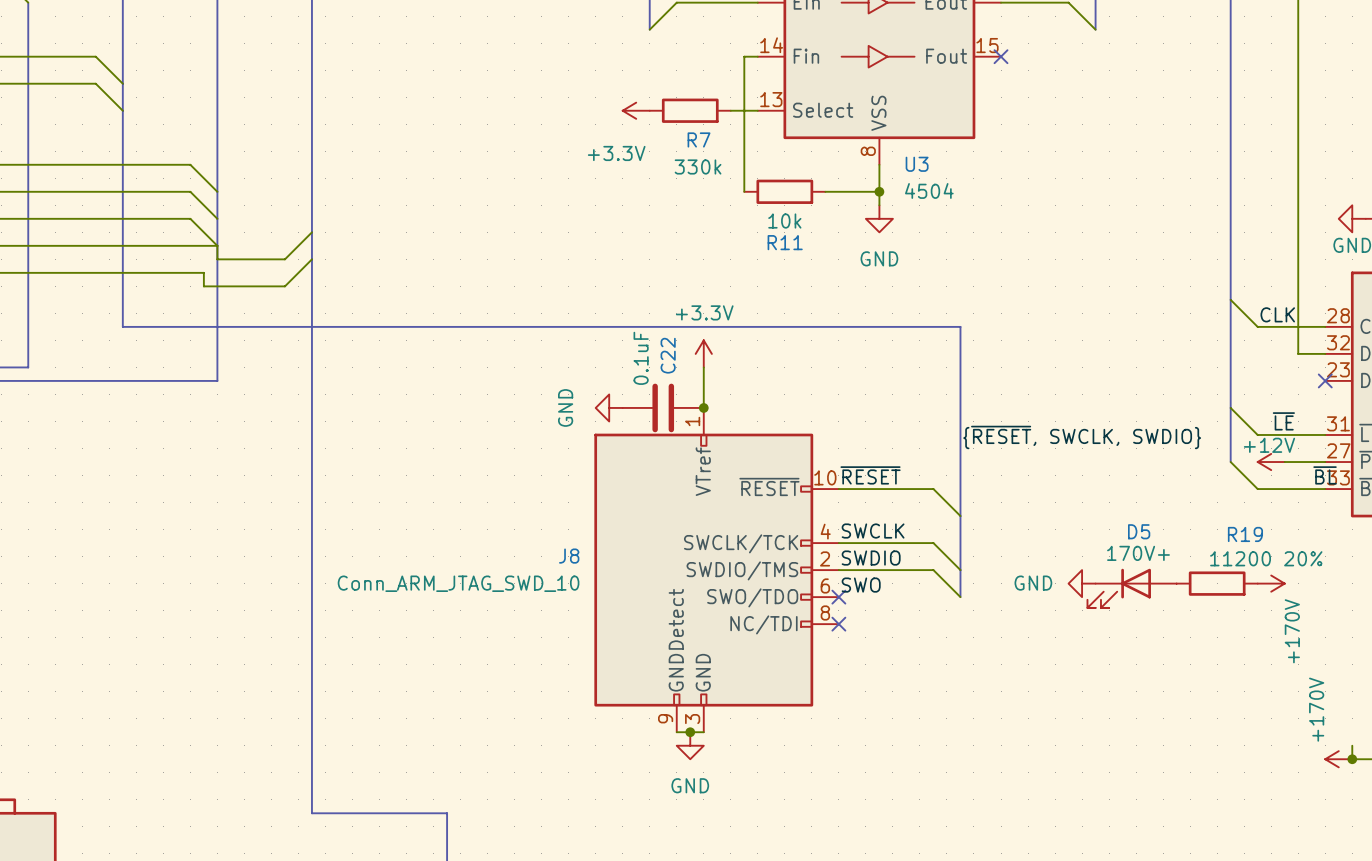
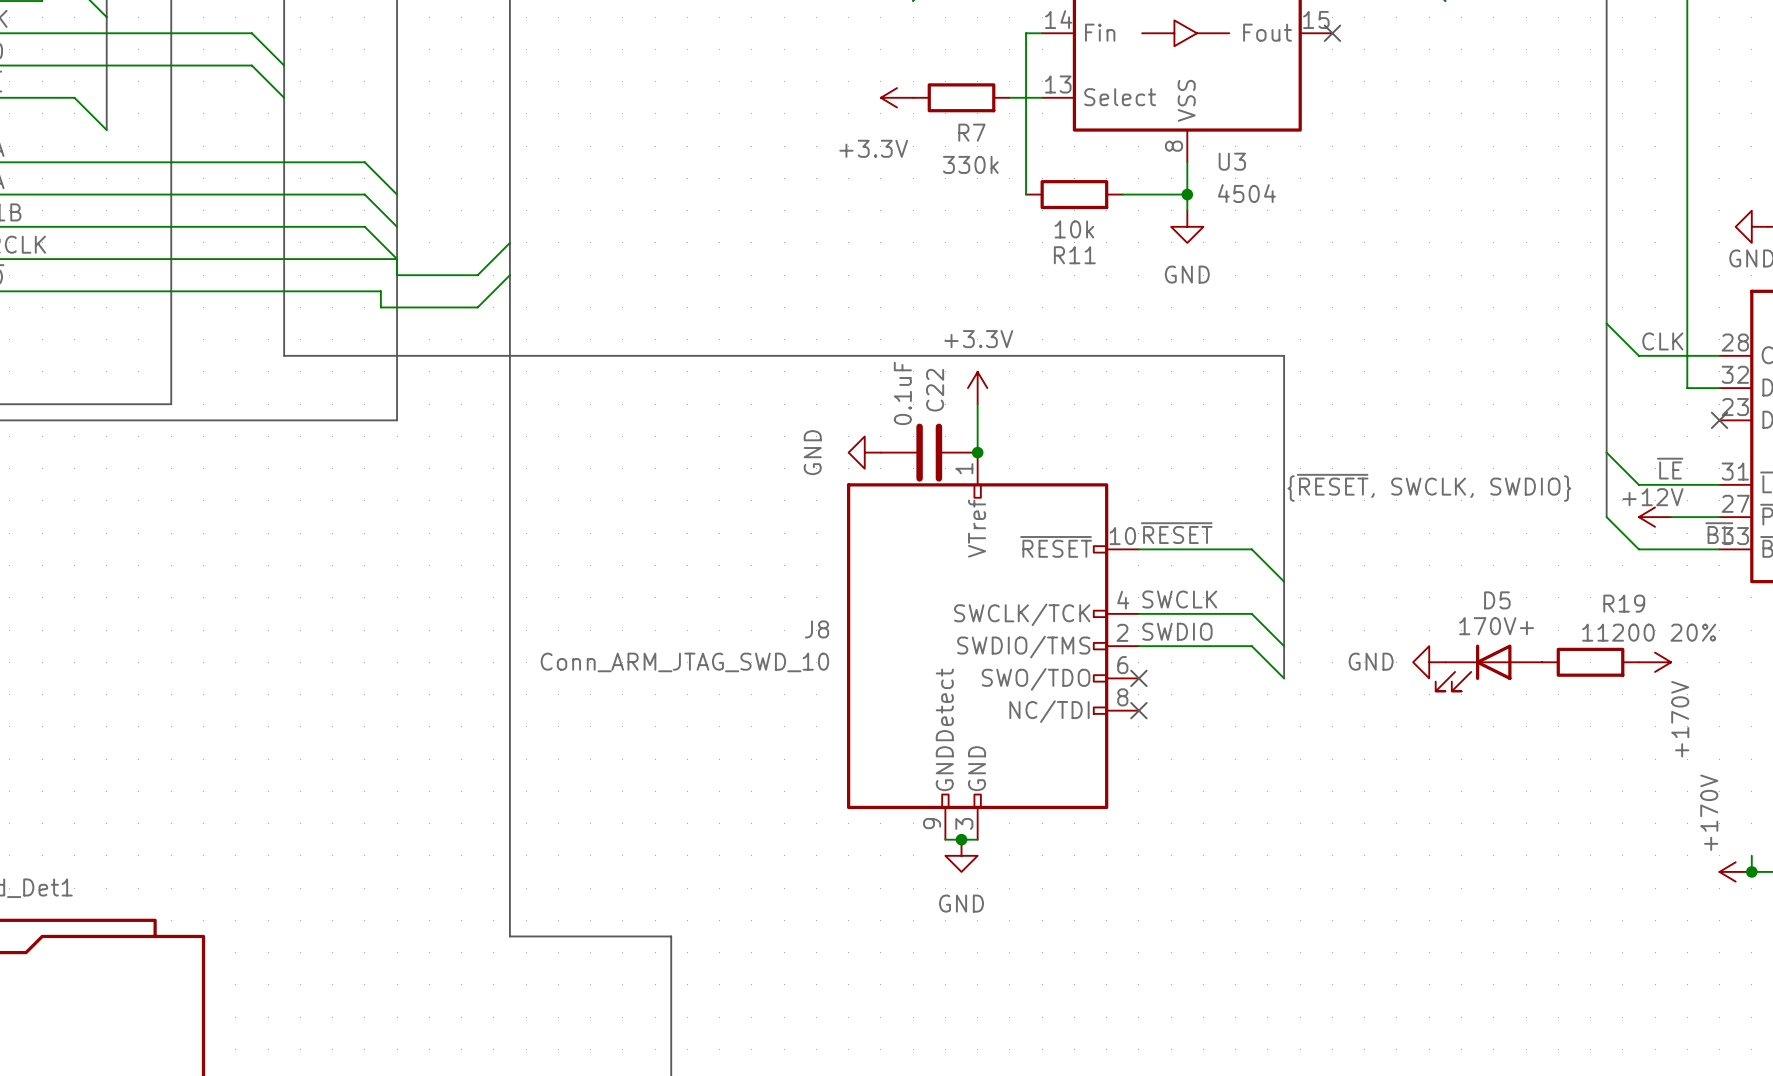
label: SWO (861, 585) -> none

